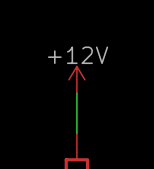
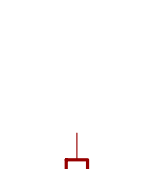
power symbol: +12V (76, 79) -> none
wire: (76, 93) (76, 133) -> none

